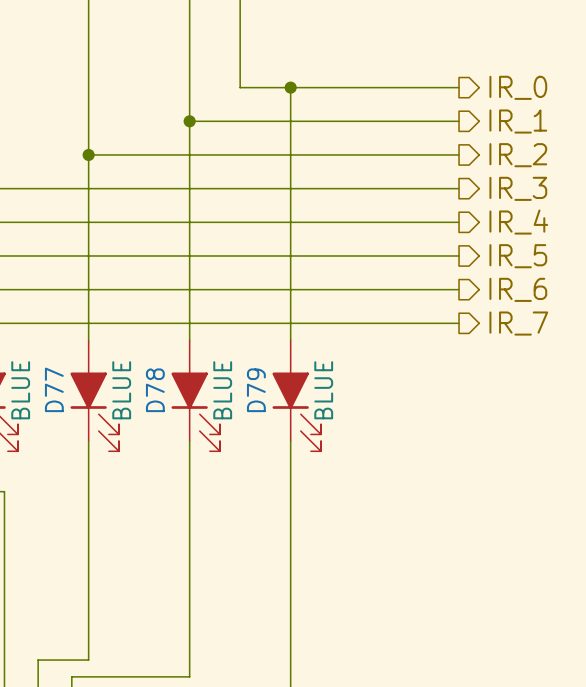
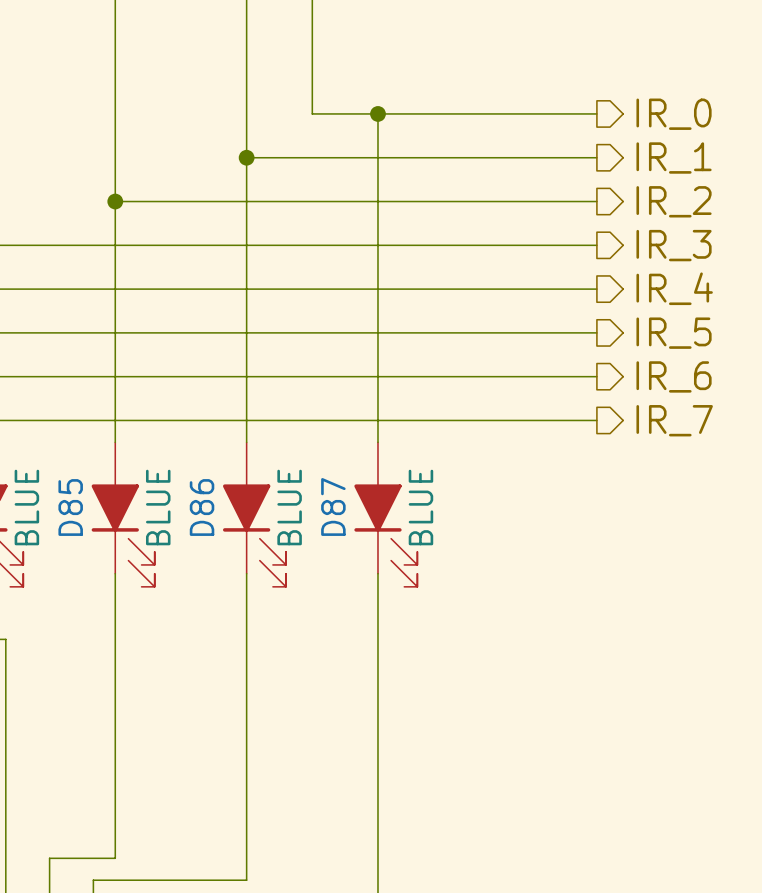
D77 name: D77 (54, 389) -> D85 (70, 507)
D78 name: D78 (155, 390) -> D86 (202, 507)
D79 name: D79 (256, 390) -> D87 (333, 506)

